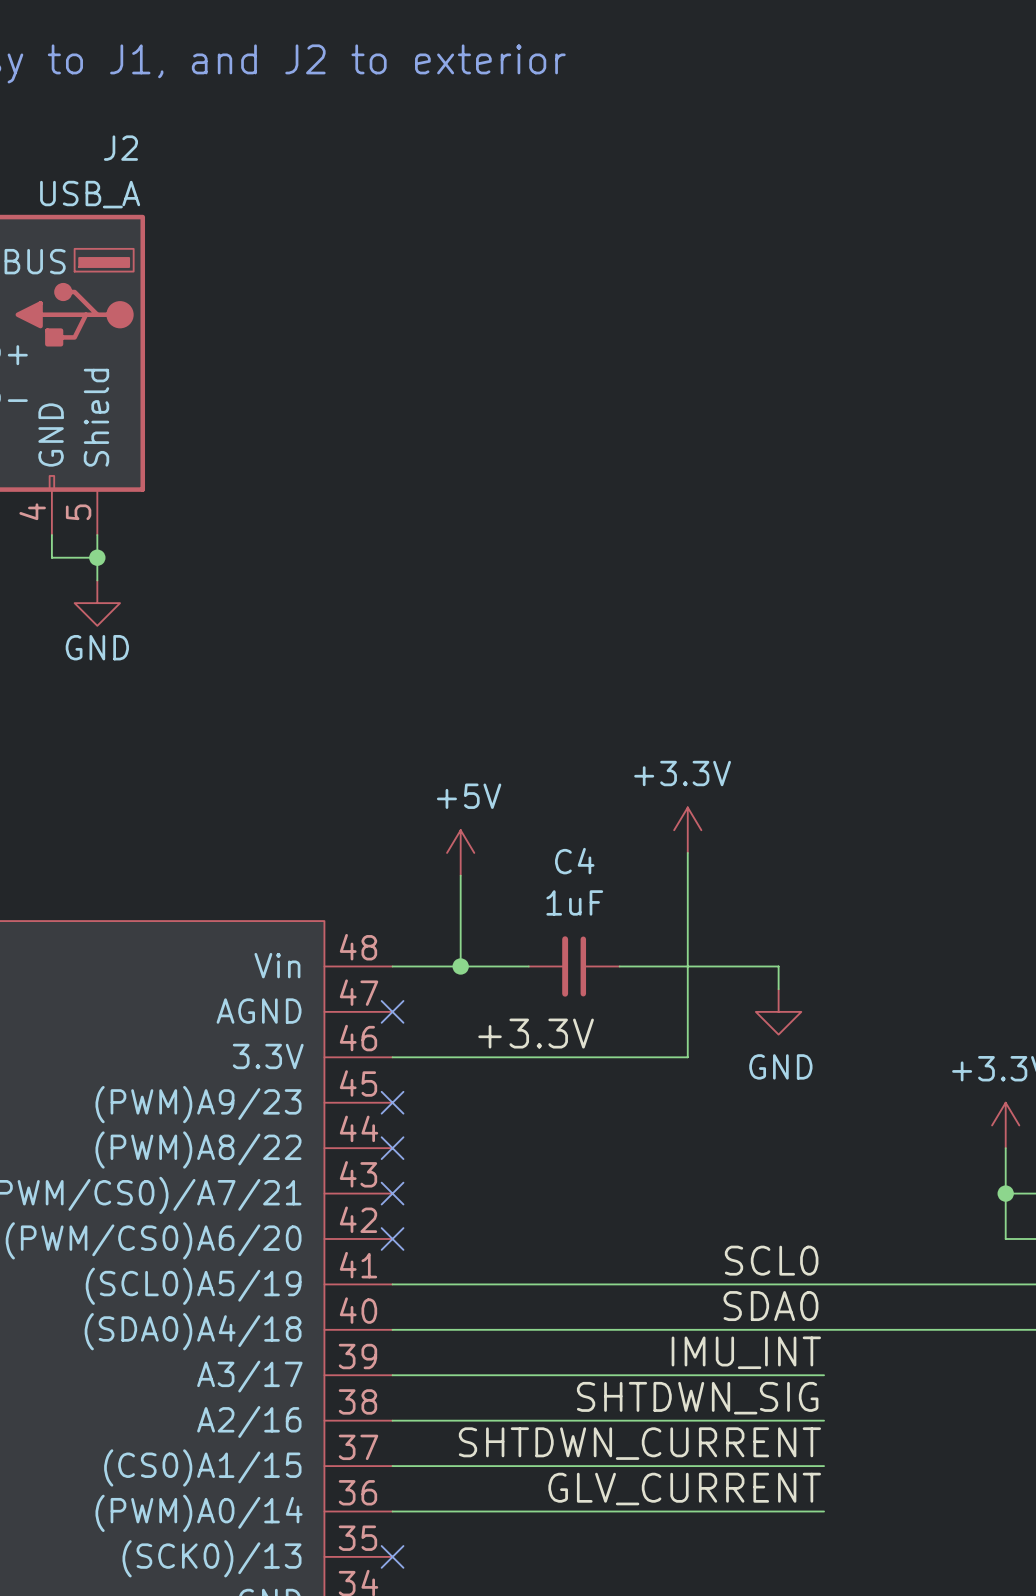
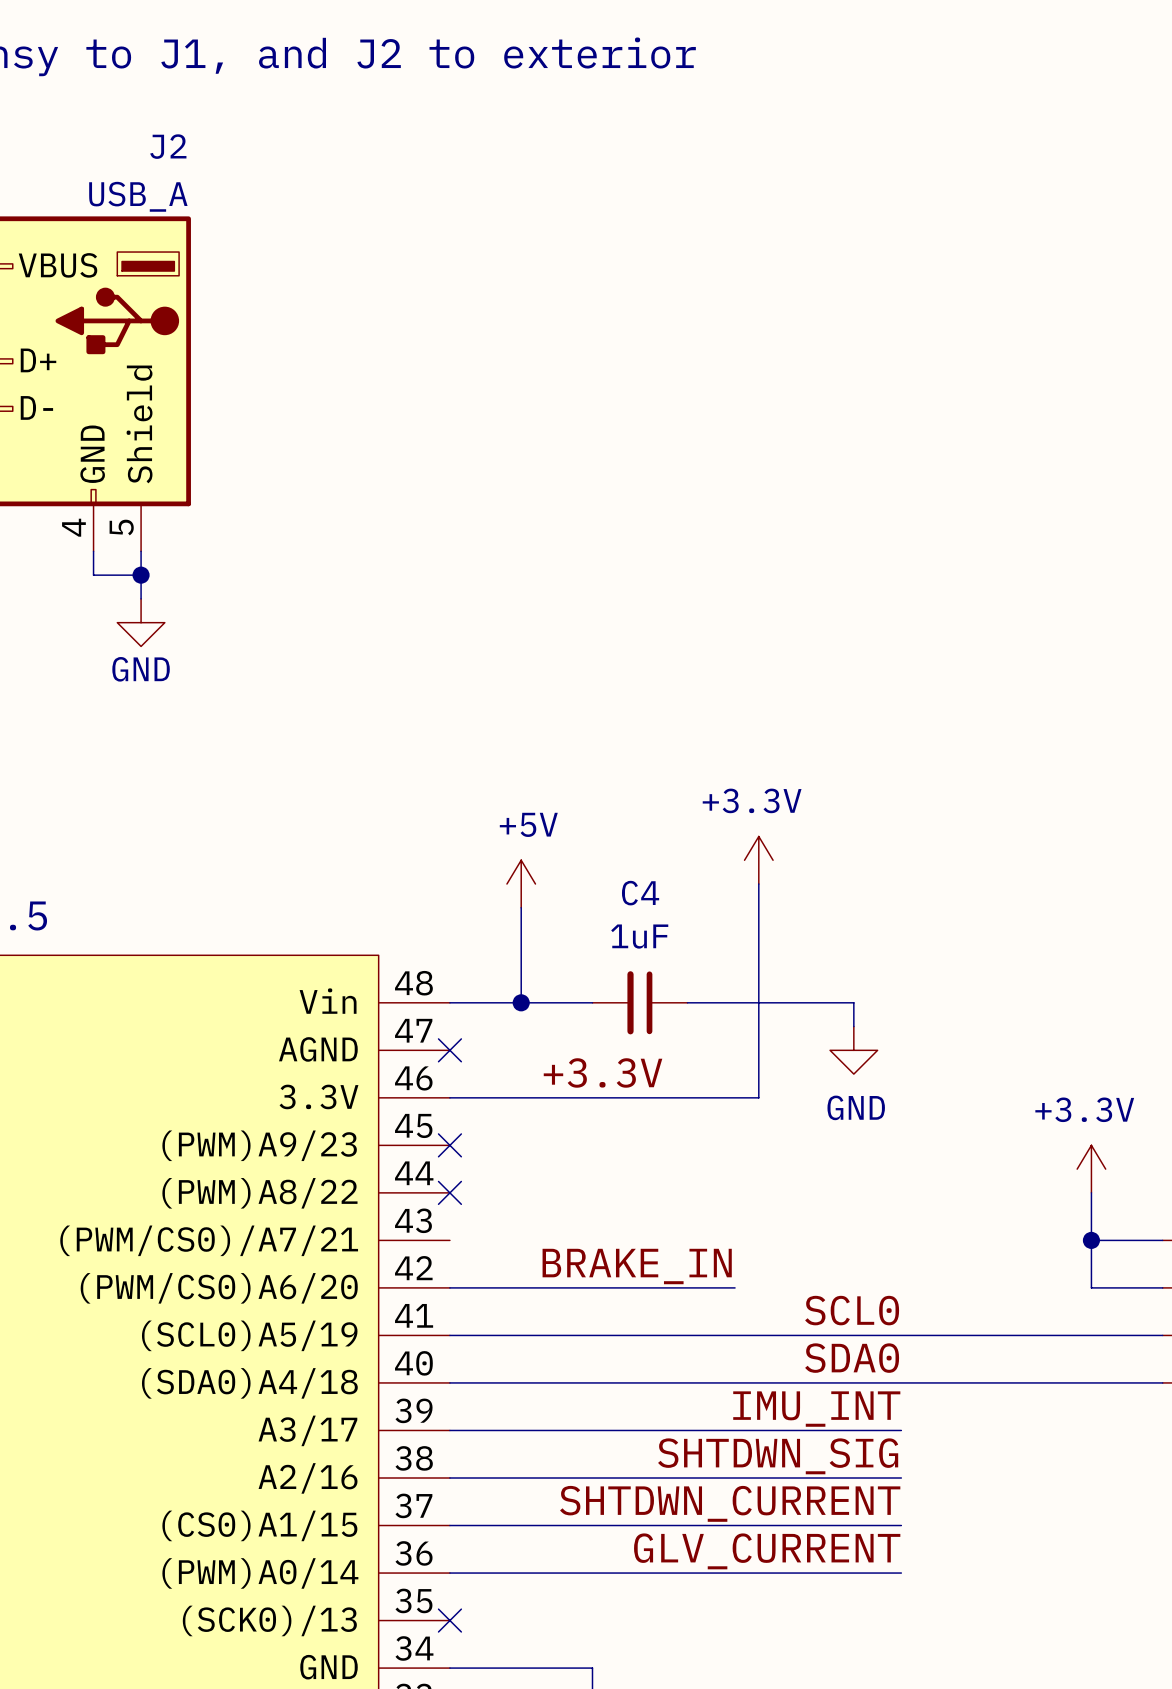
no-connect mark: (392, 1193) -> none
label: none -> BRAKE_IN (637, 1266)
wire: none -> (449, 1287) (735, 1287)
no-connect mark: (392, 1238) -> none

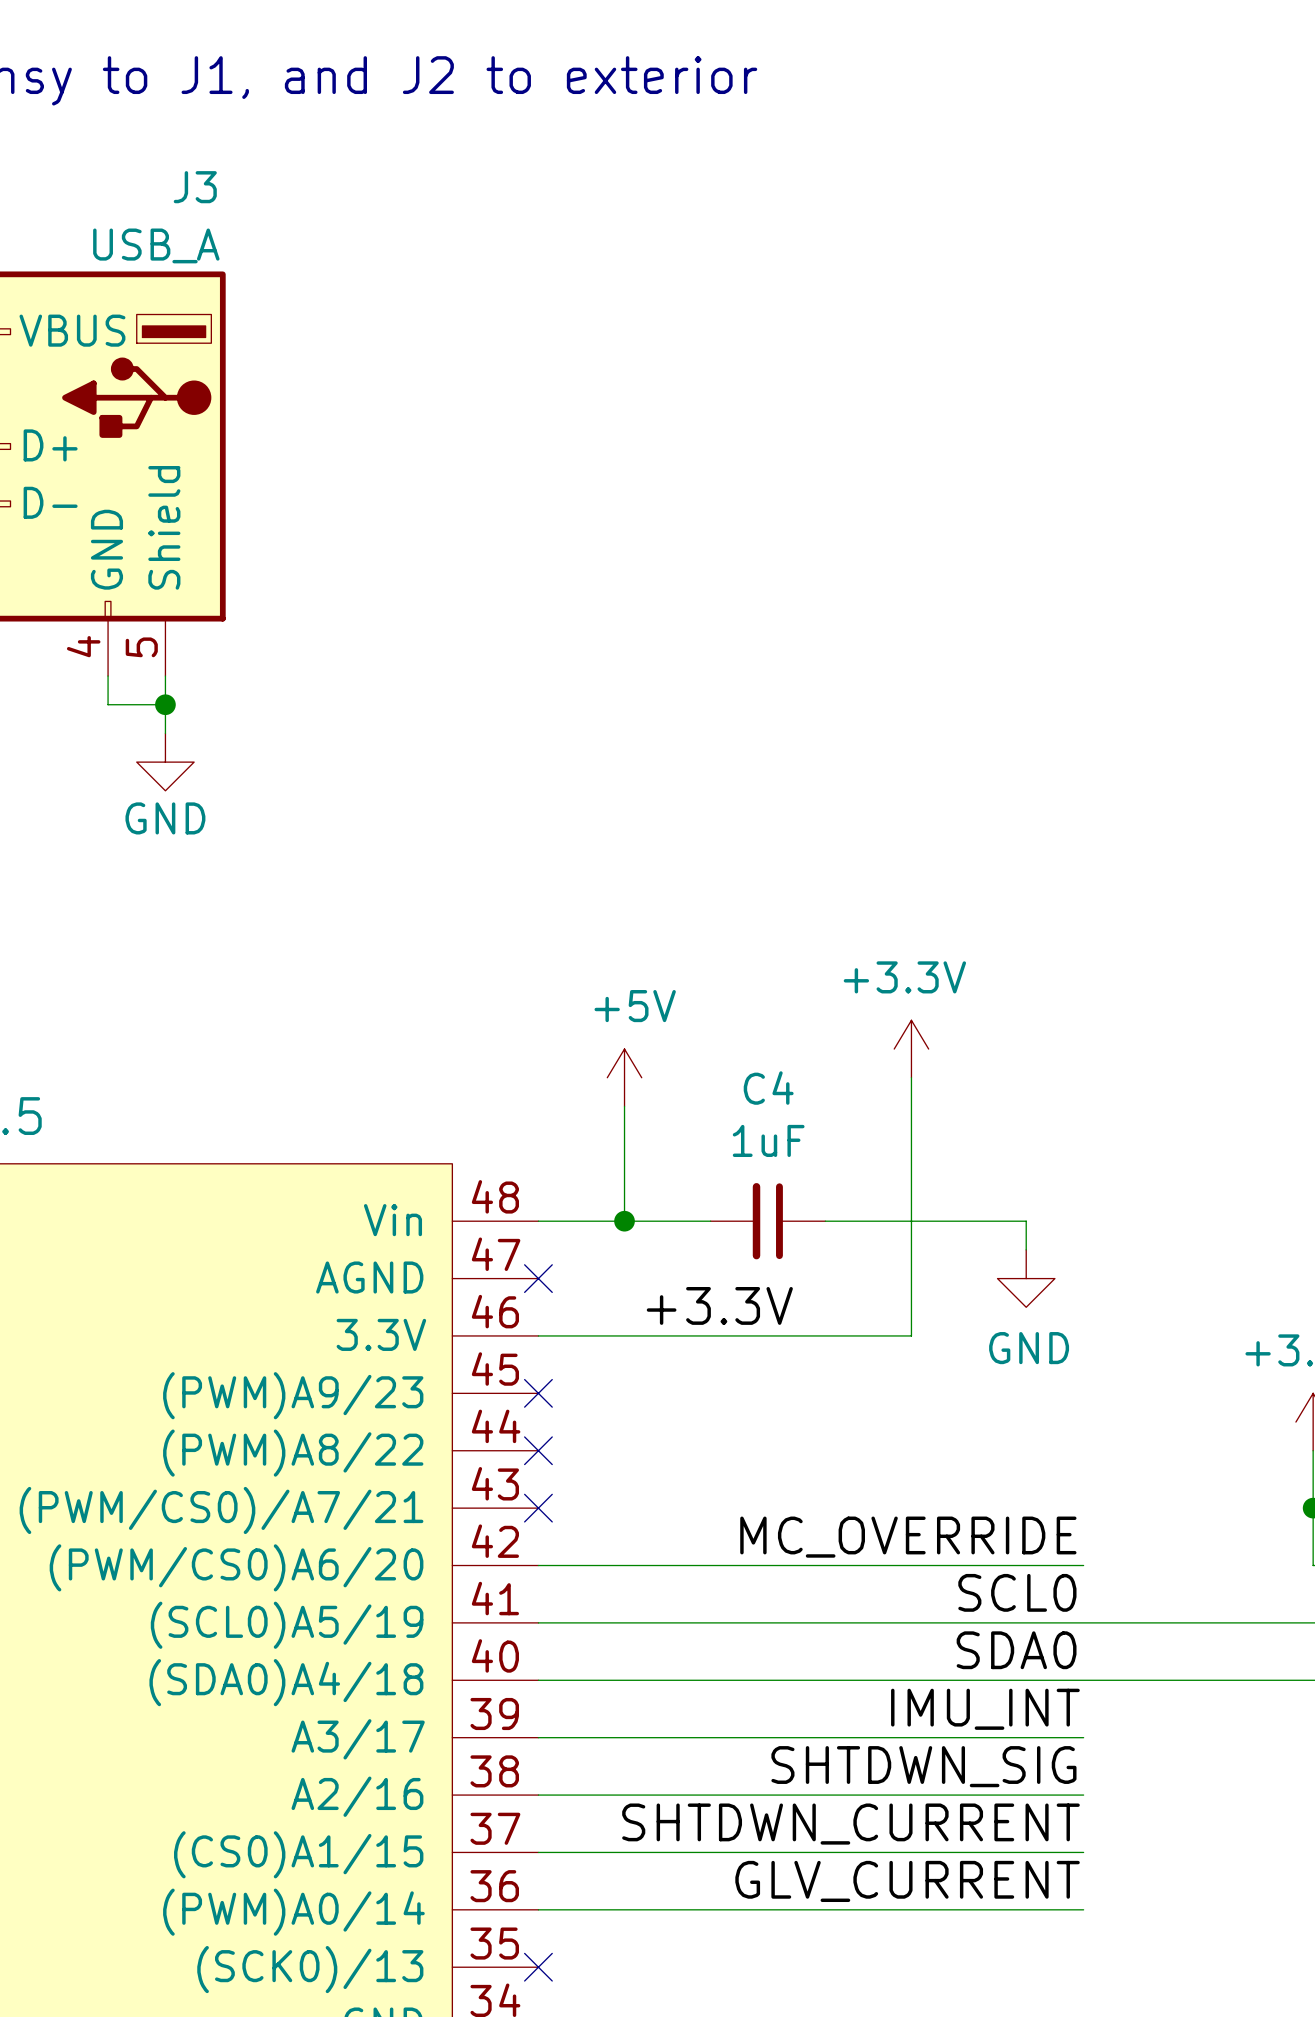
J2 name: J2 (168, 146) -> J3 (195, 187)
no-connect mark: none -> (538, 1508)
label: BRAKE_IN (637, 1266) -> none
label: none -> MC_OVERRIDE (908, 1537)
wire: none -> (882, 1565) (1083, 1565)

